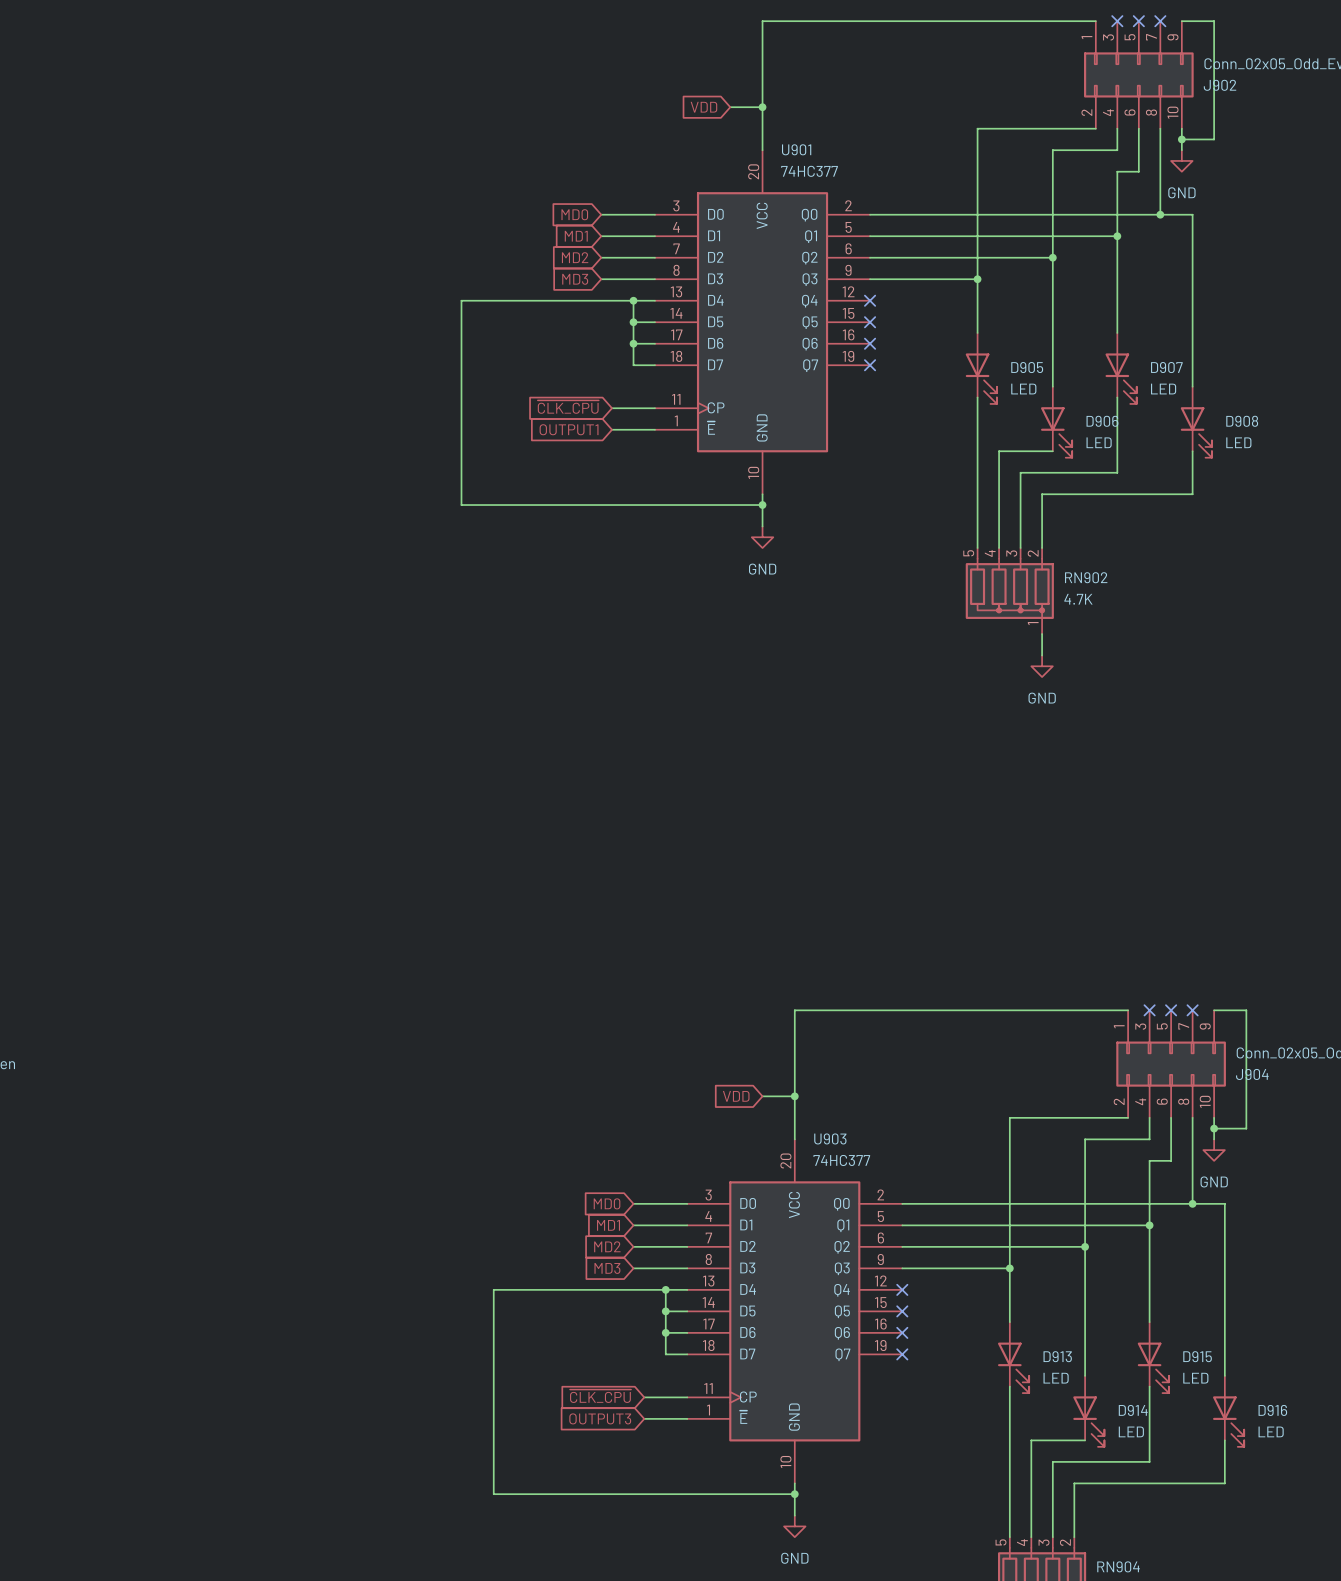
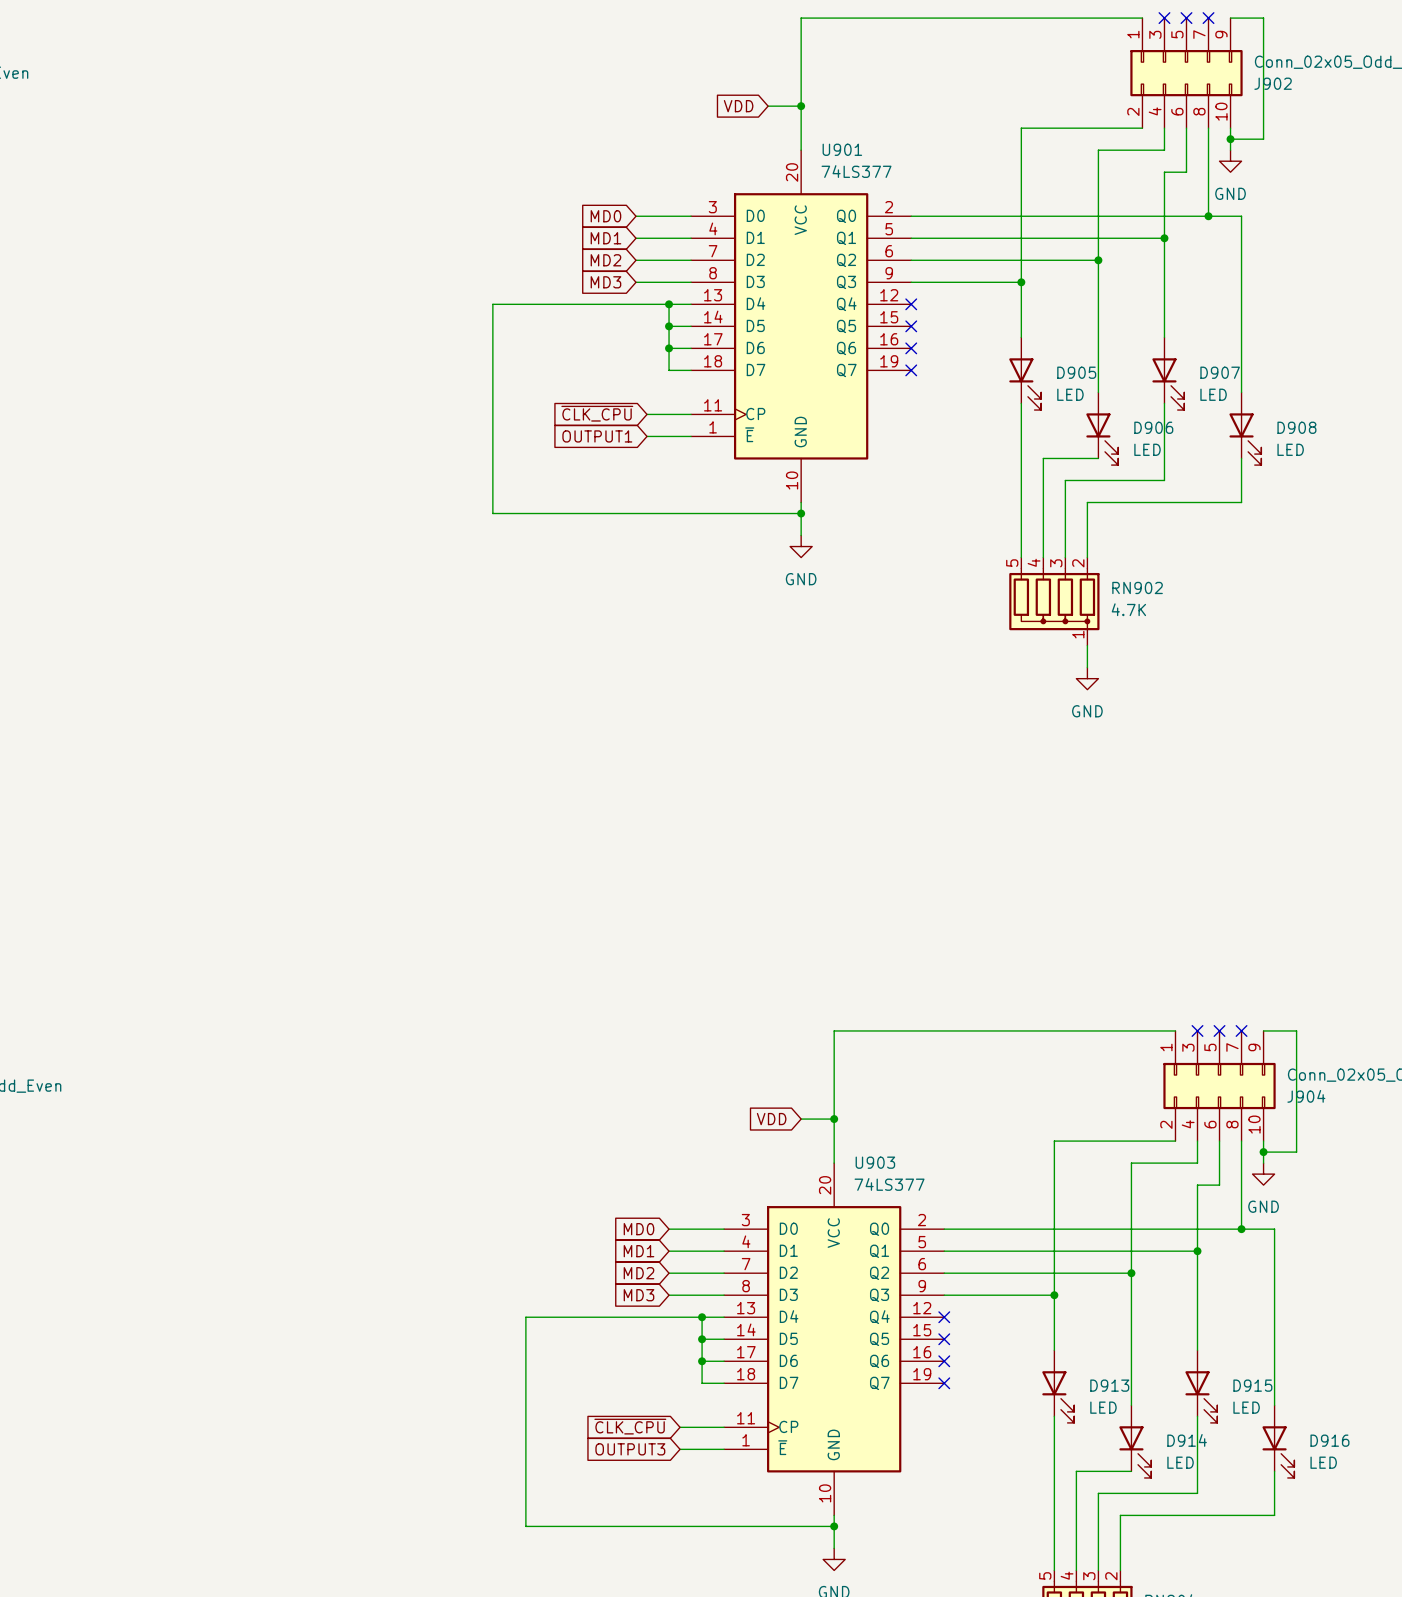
U901 value: 74HC377 (809, 171) -> 74LS377 (856, 171)
U903 value: 74HC377 (841, 1160) -> 74LS377 (889, 1184)

